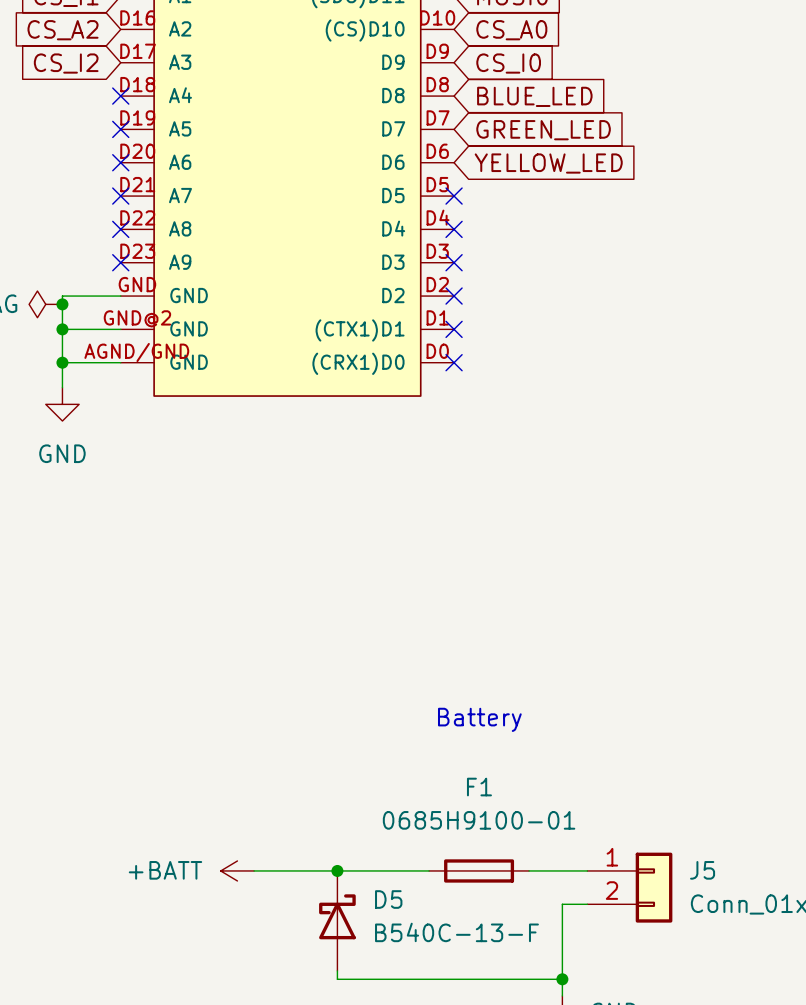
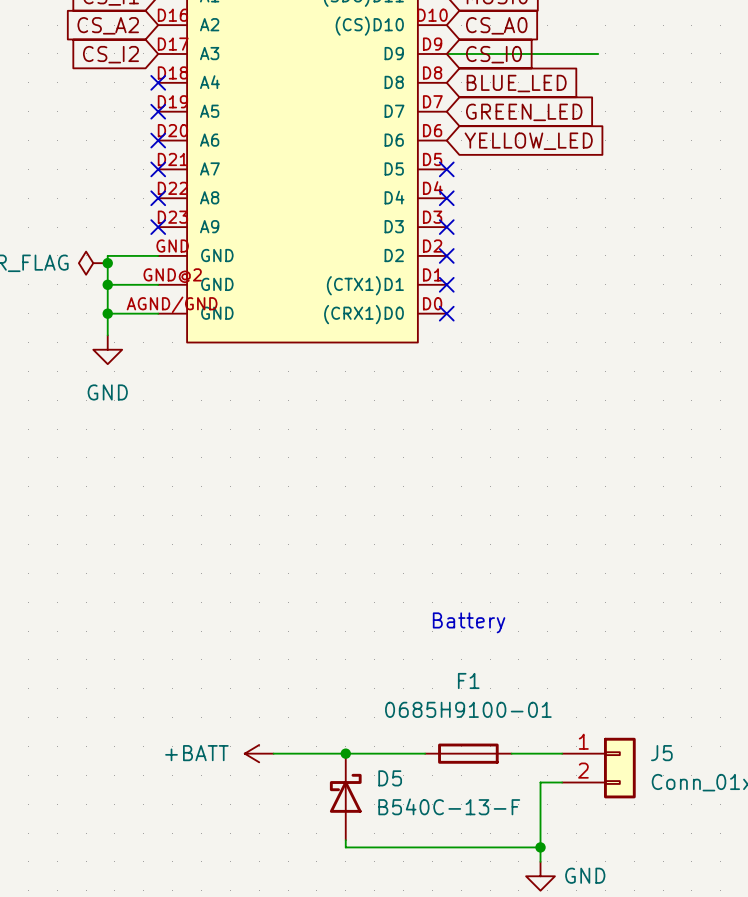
wire: none -> (446, 53) (598, 53)

